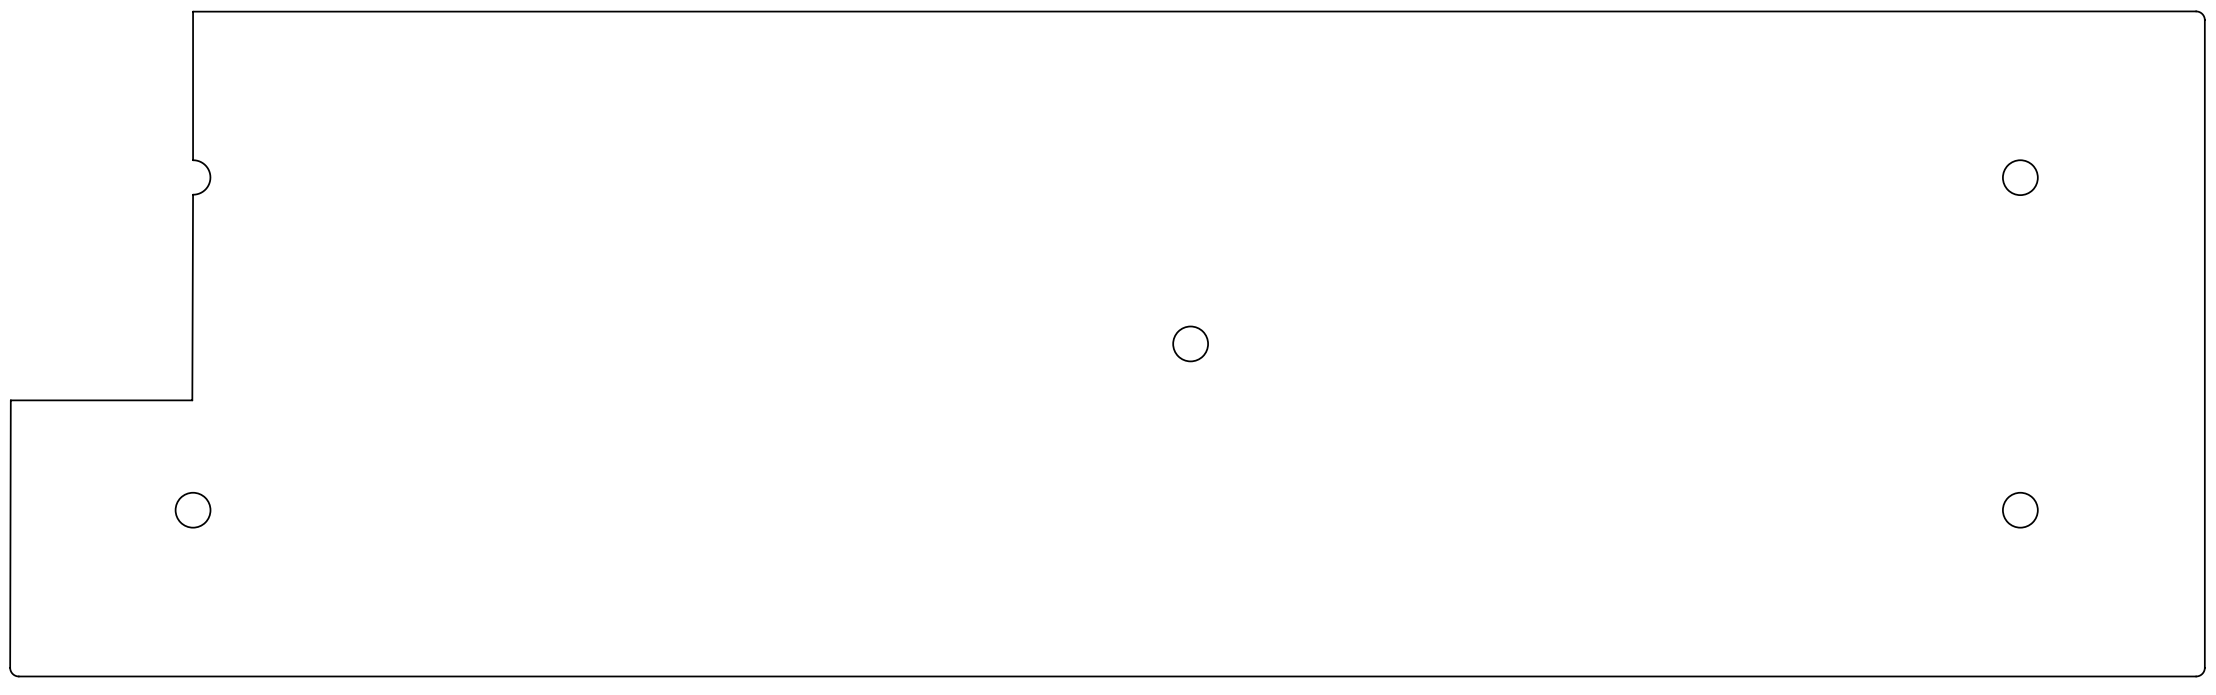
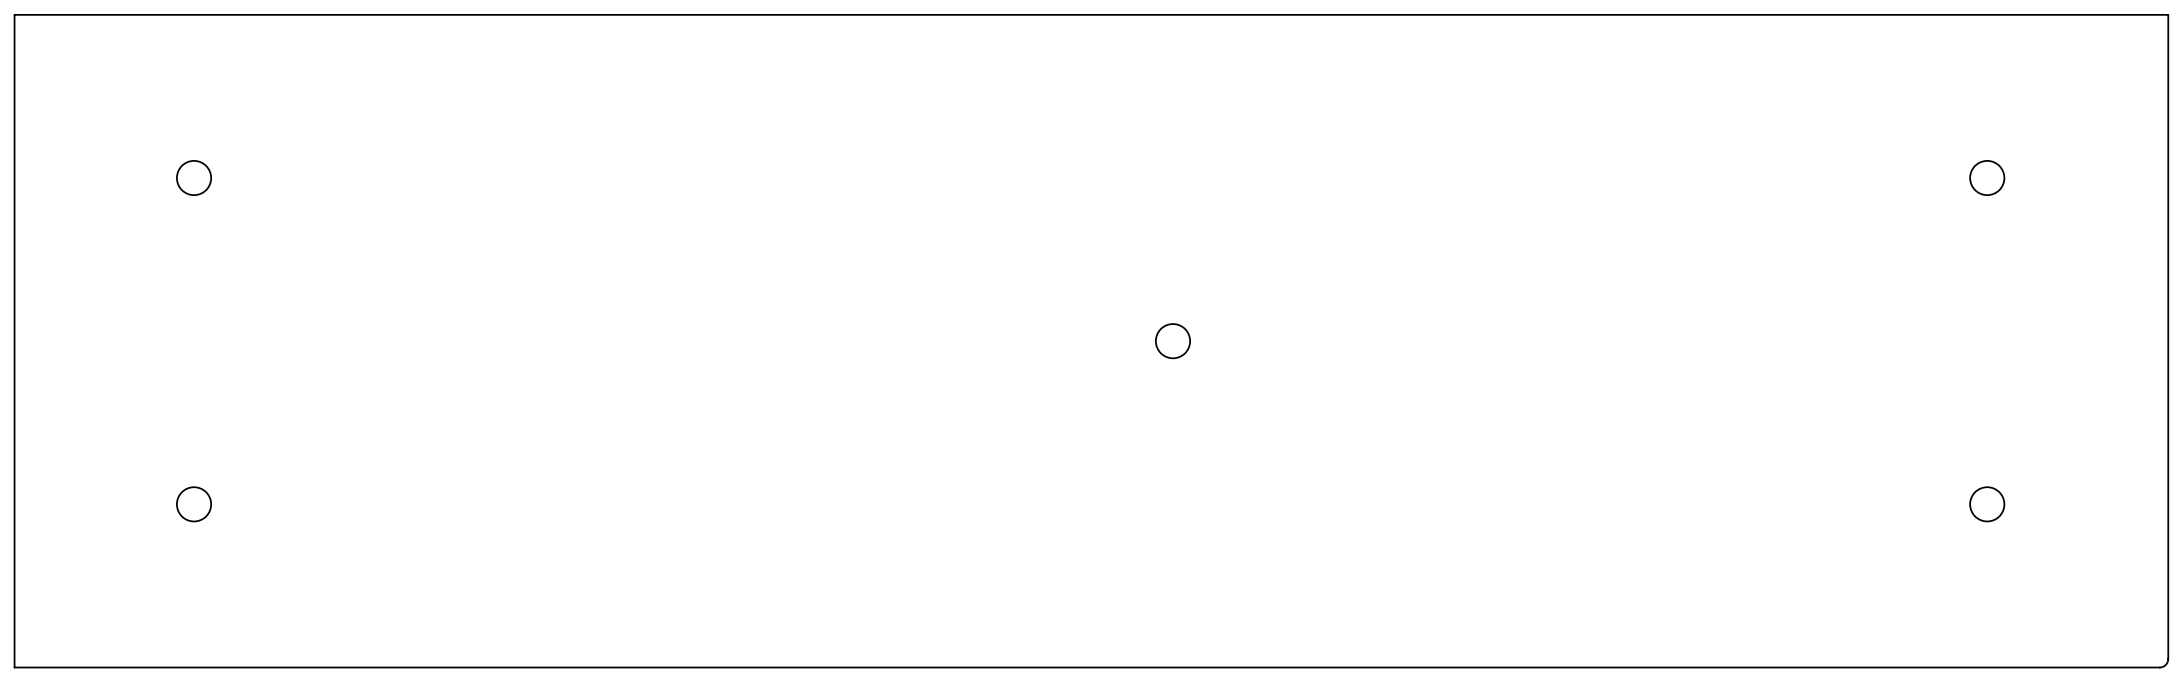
board edge: (2204, 20) (2202, 13) (2196, 11) (193, 11) (193, 160) (201, 162) (206, 165) (210, 177) (206, 188) (201, 192) (193, 194) (192, 400) (10, 400) (10, 667) (12, 673) (18, 676) -> (2168, 23) (2168, 14) (14, 14) (14, 667) (23, 667)
round board edge: none -> [176, 160, 212, 196]

